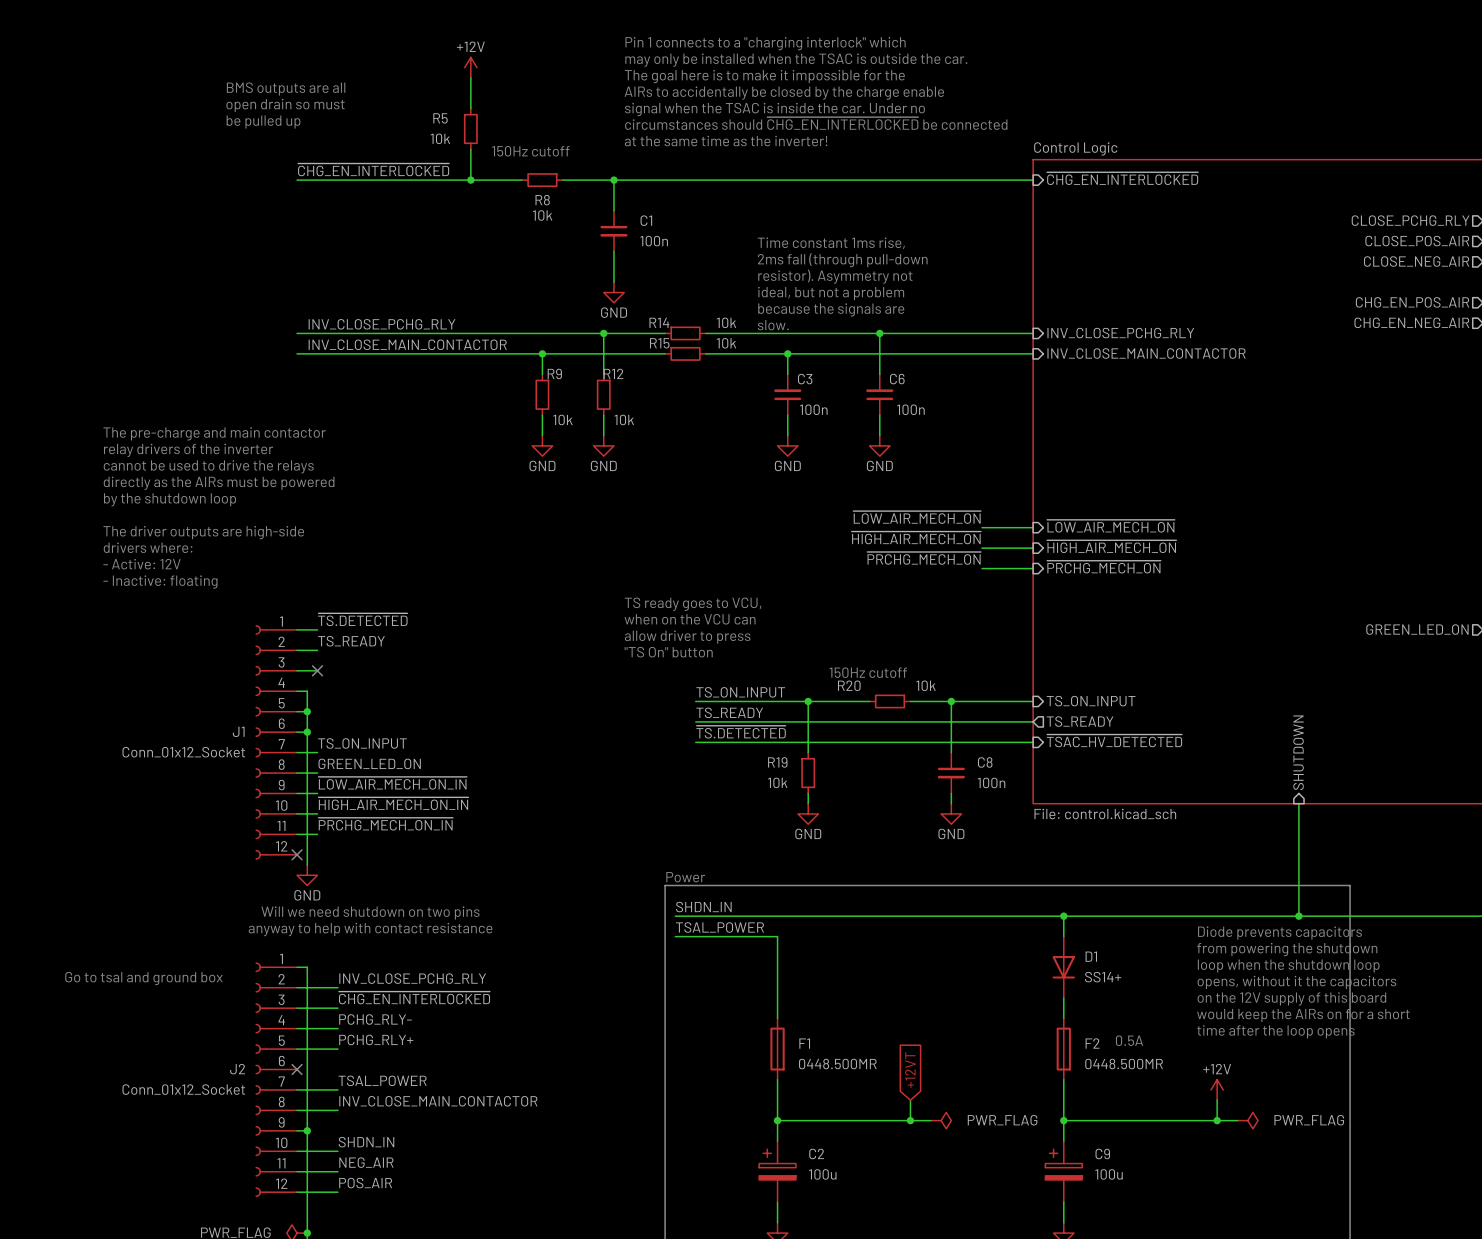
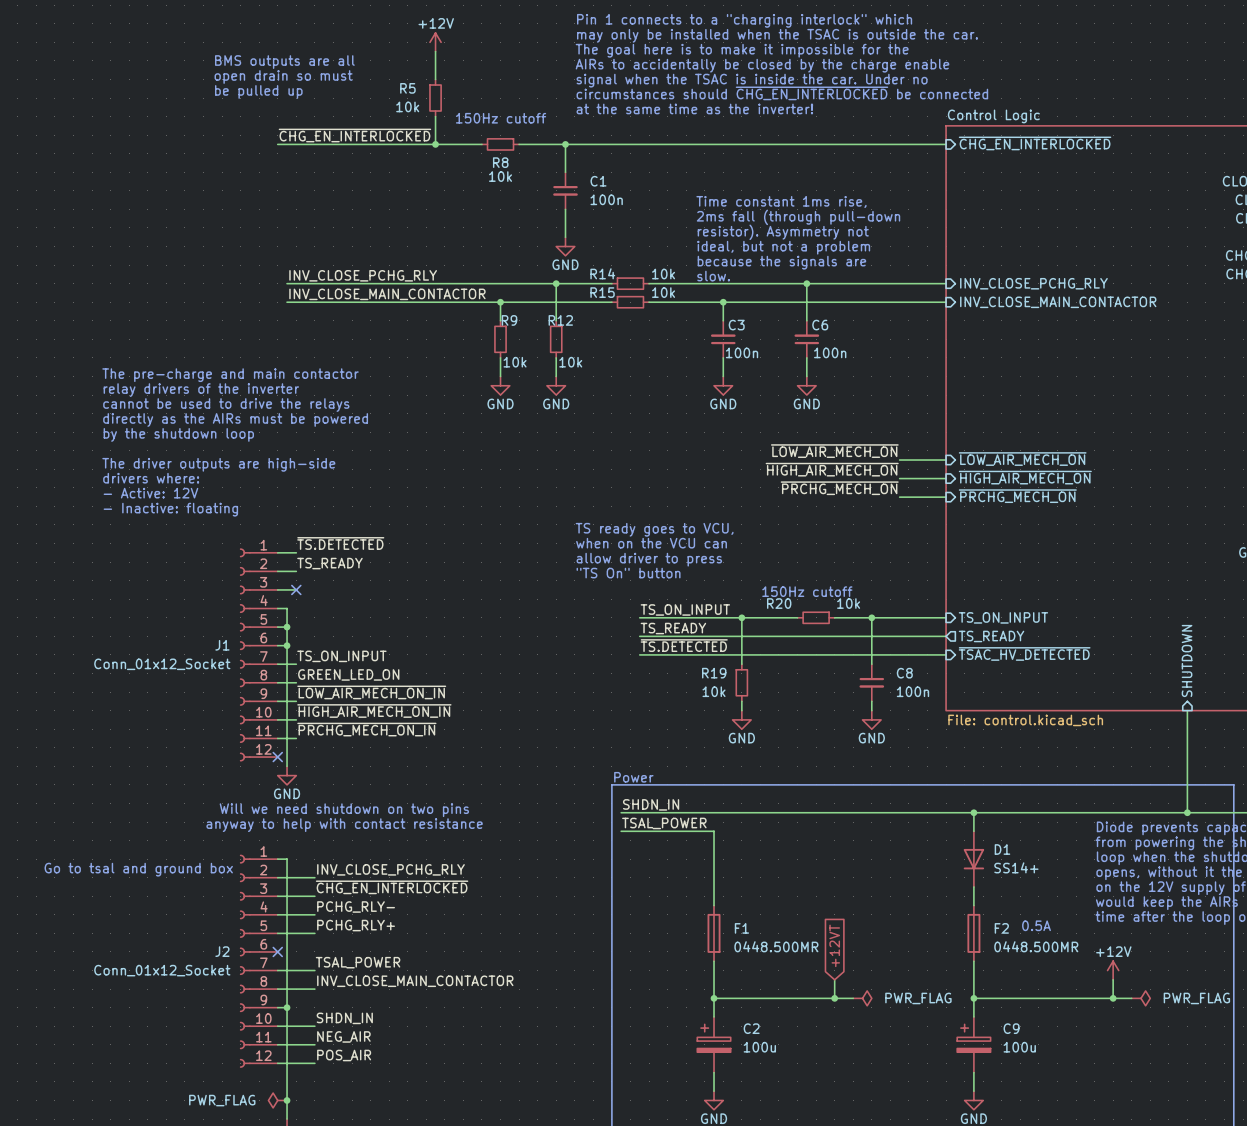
wire: (297, 333) (307, 333) -> none
wire: (297, 353) (307, 353) -> none

